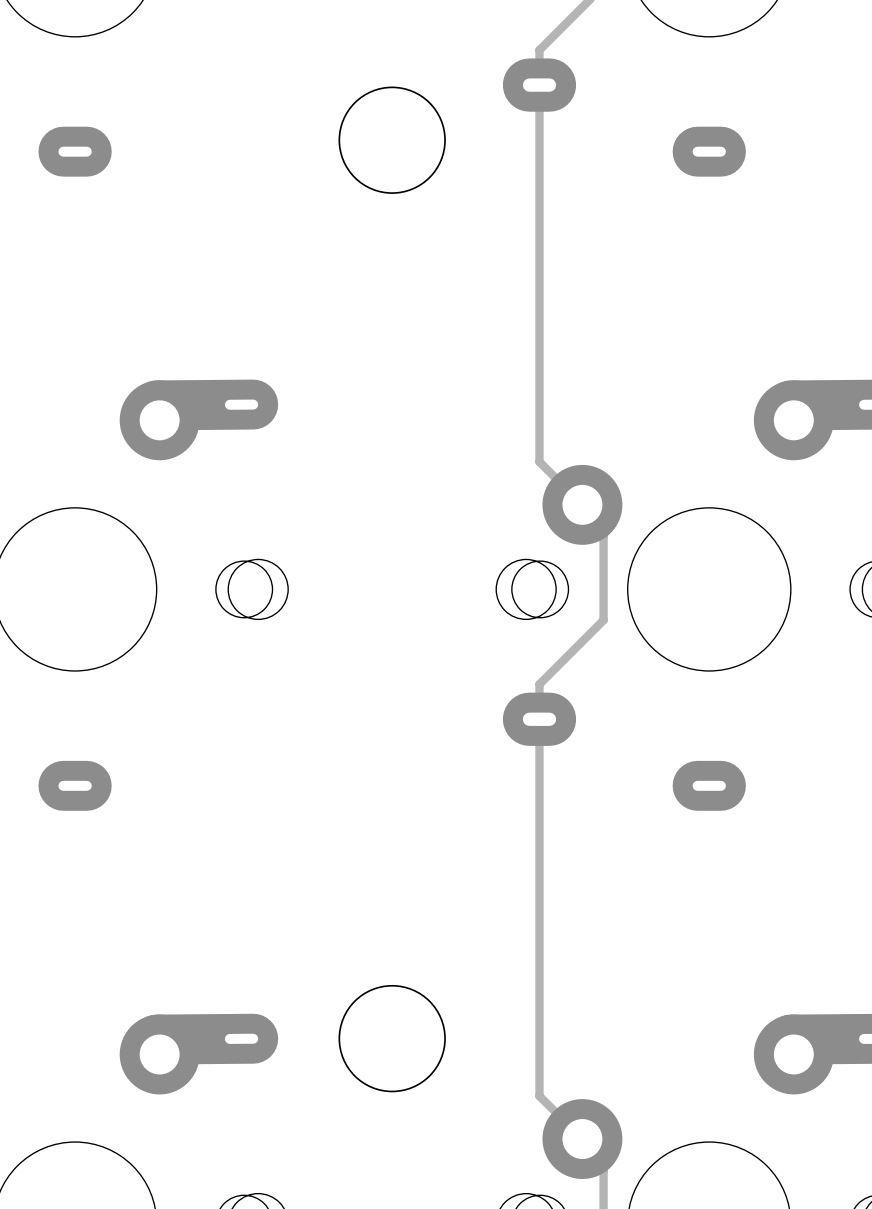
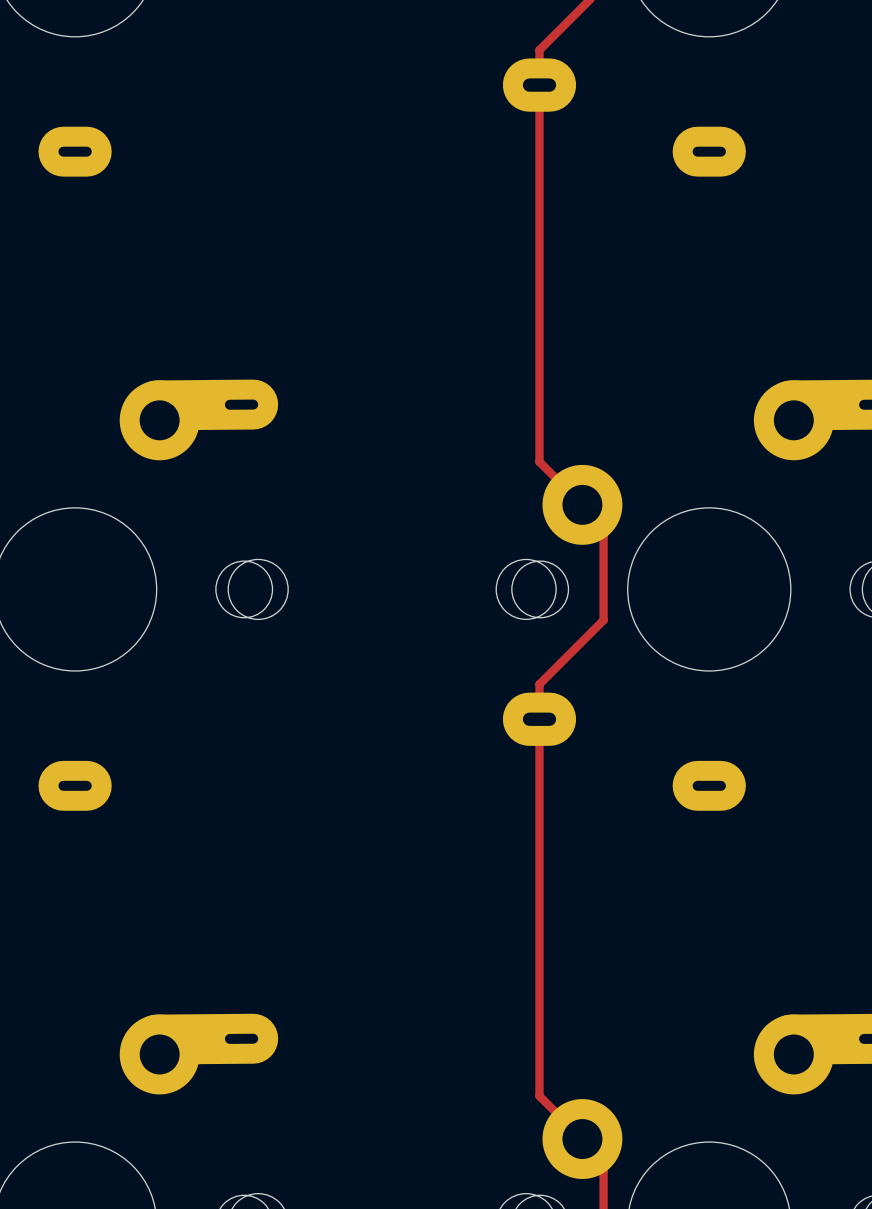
round board edge: [338, 86, 446, 194] -> none
round board edge: [338, 984, 446, 1093] -> none

